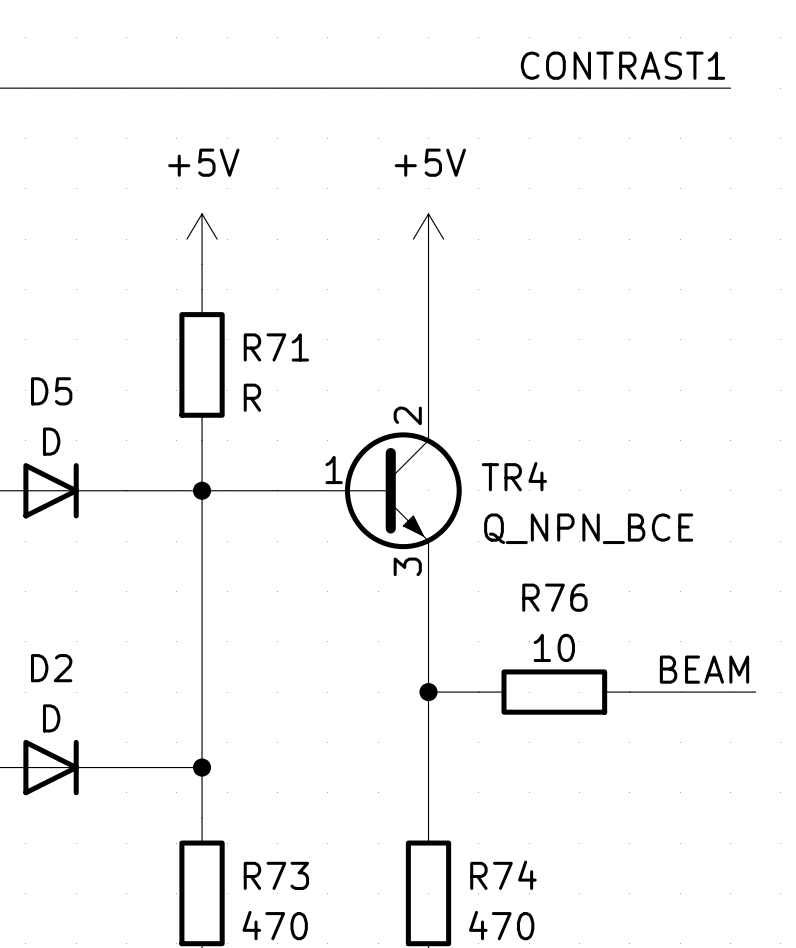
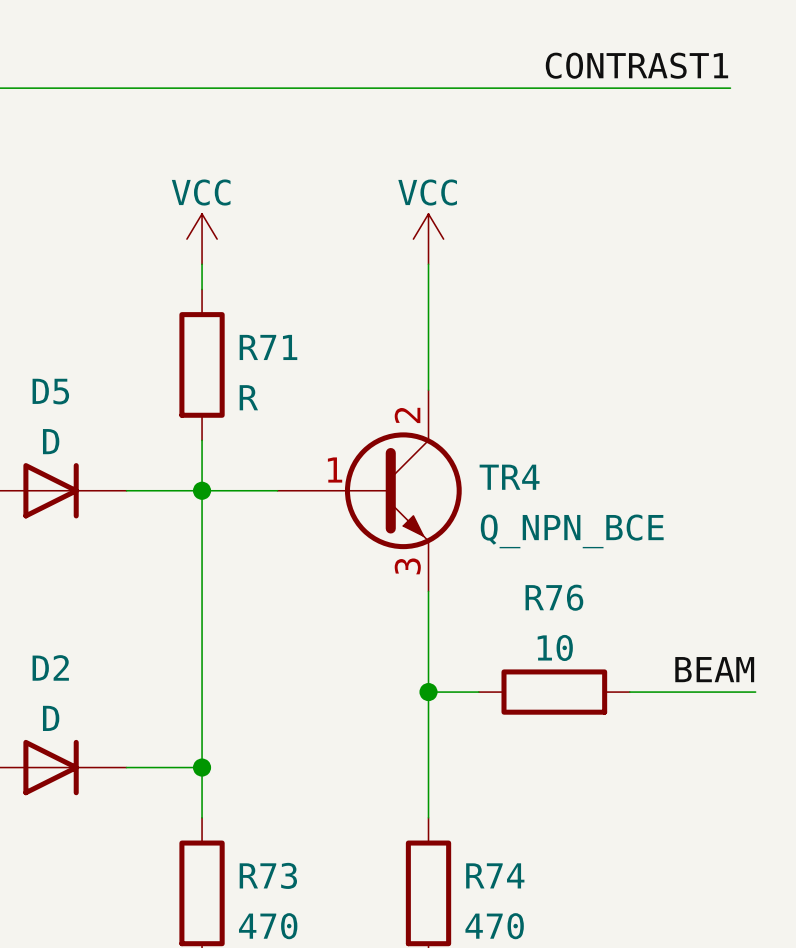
power symbol: +5V (202, 239) -> VCC (202, 239)
power symbol: +5V (428, 239) -> VCC (428, 239)

